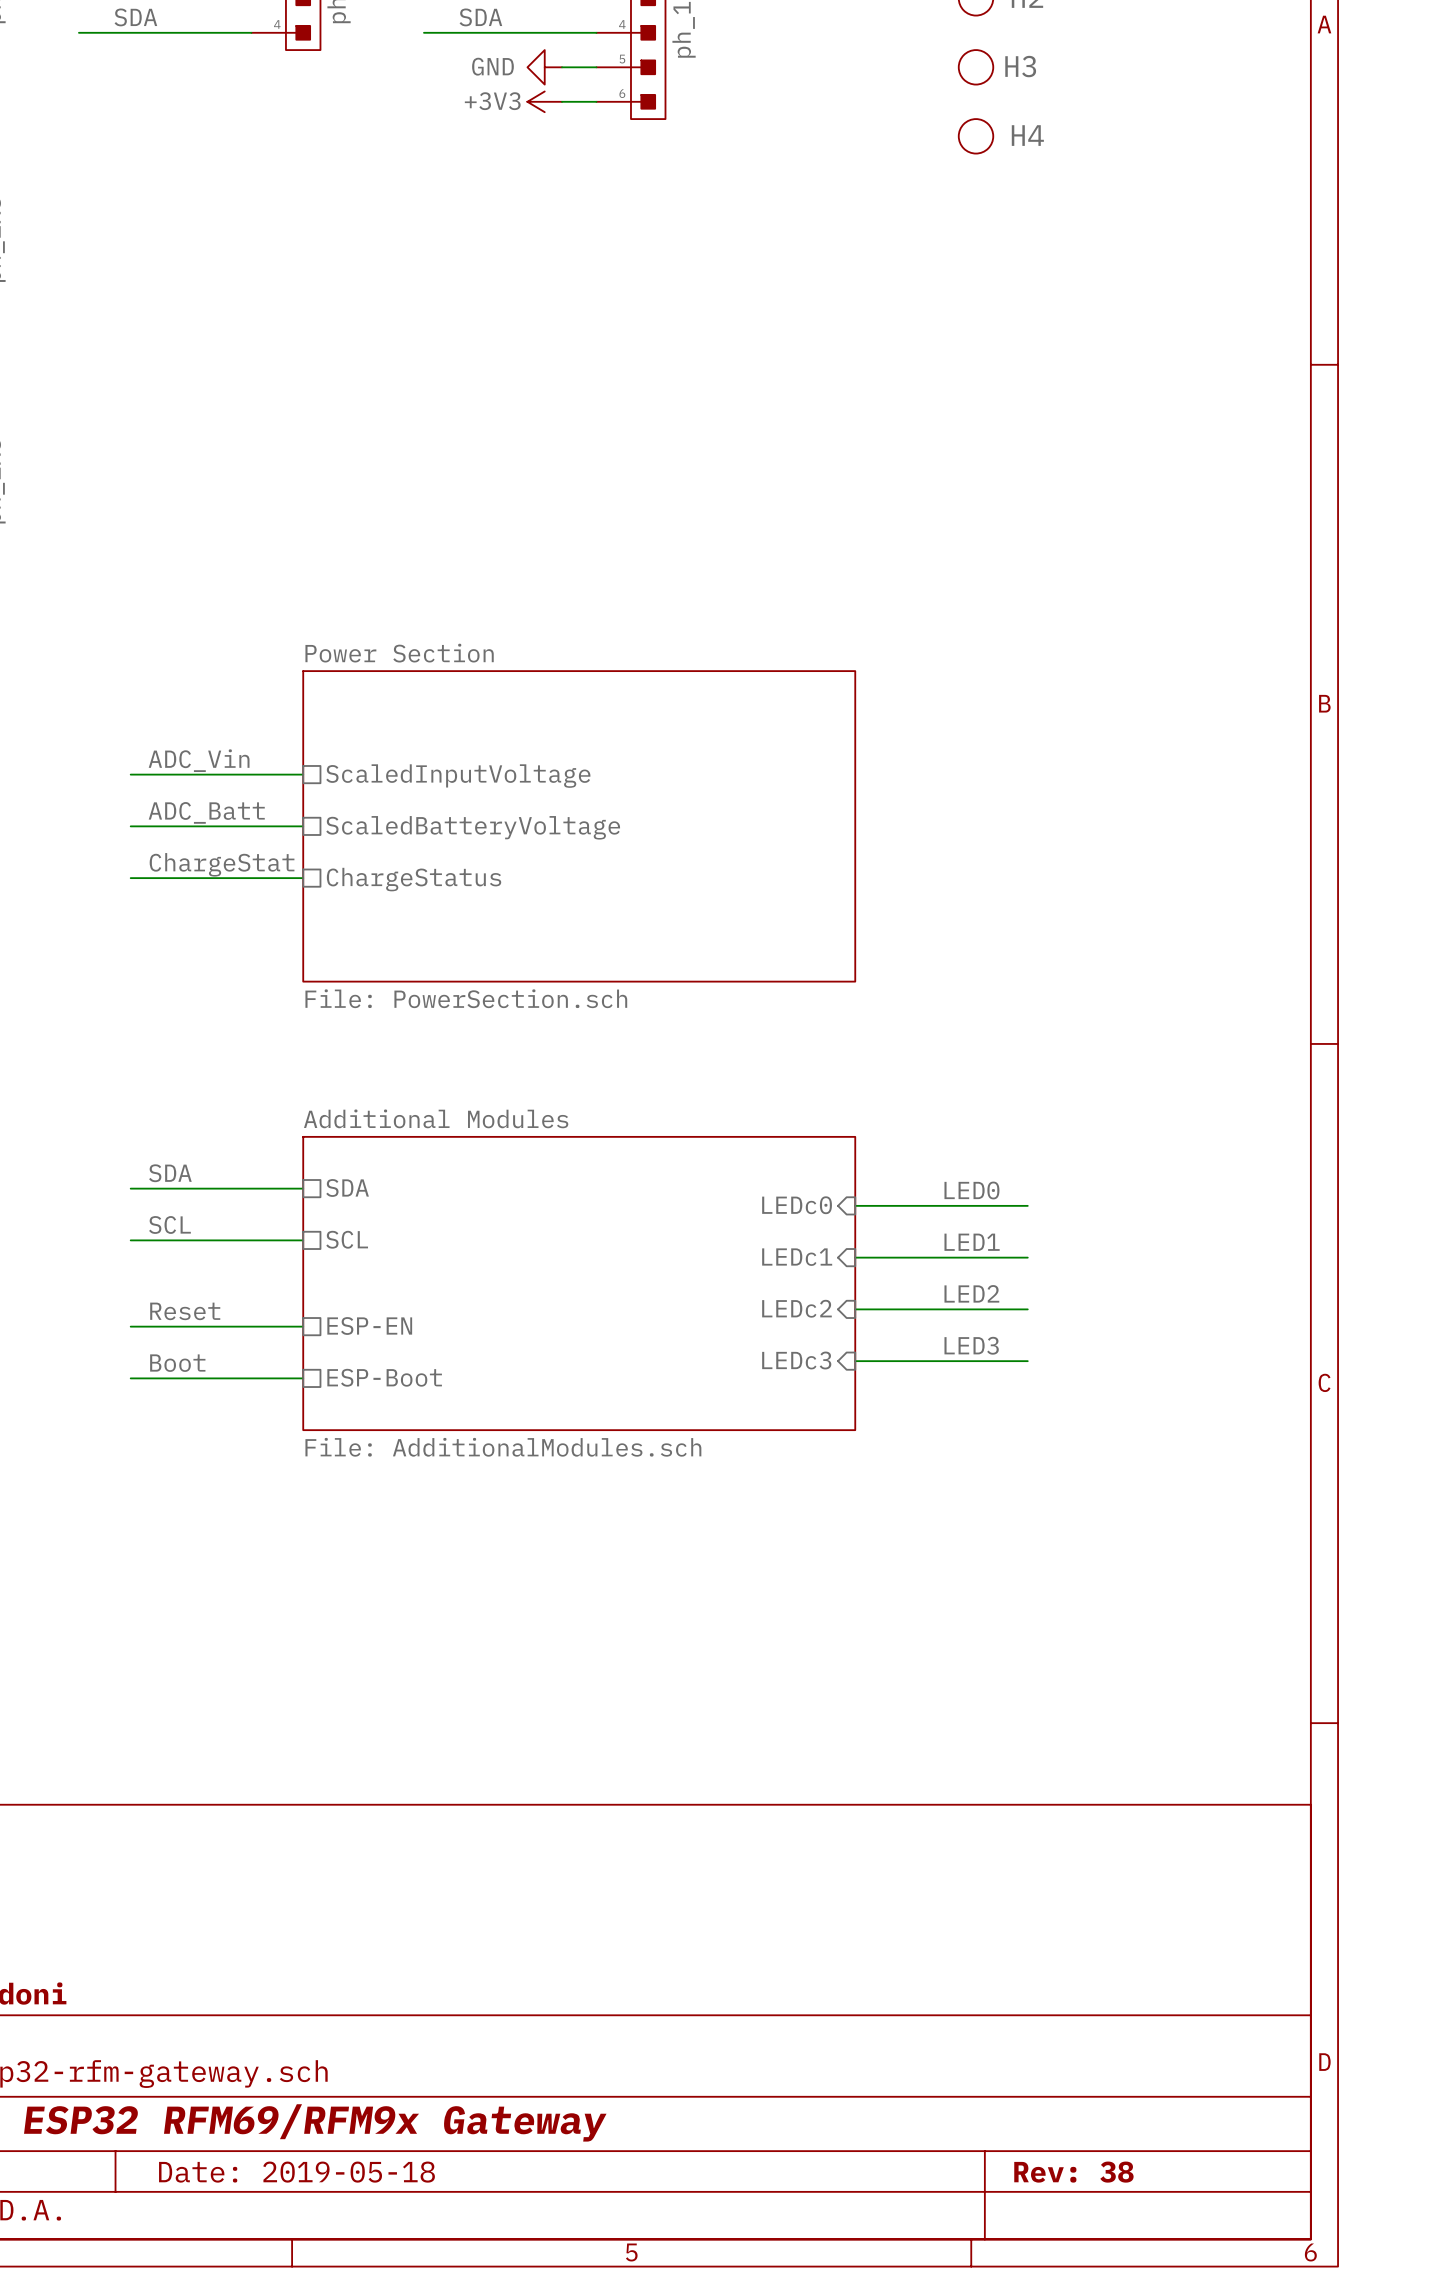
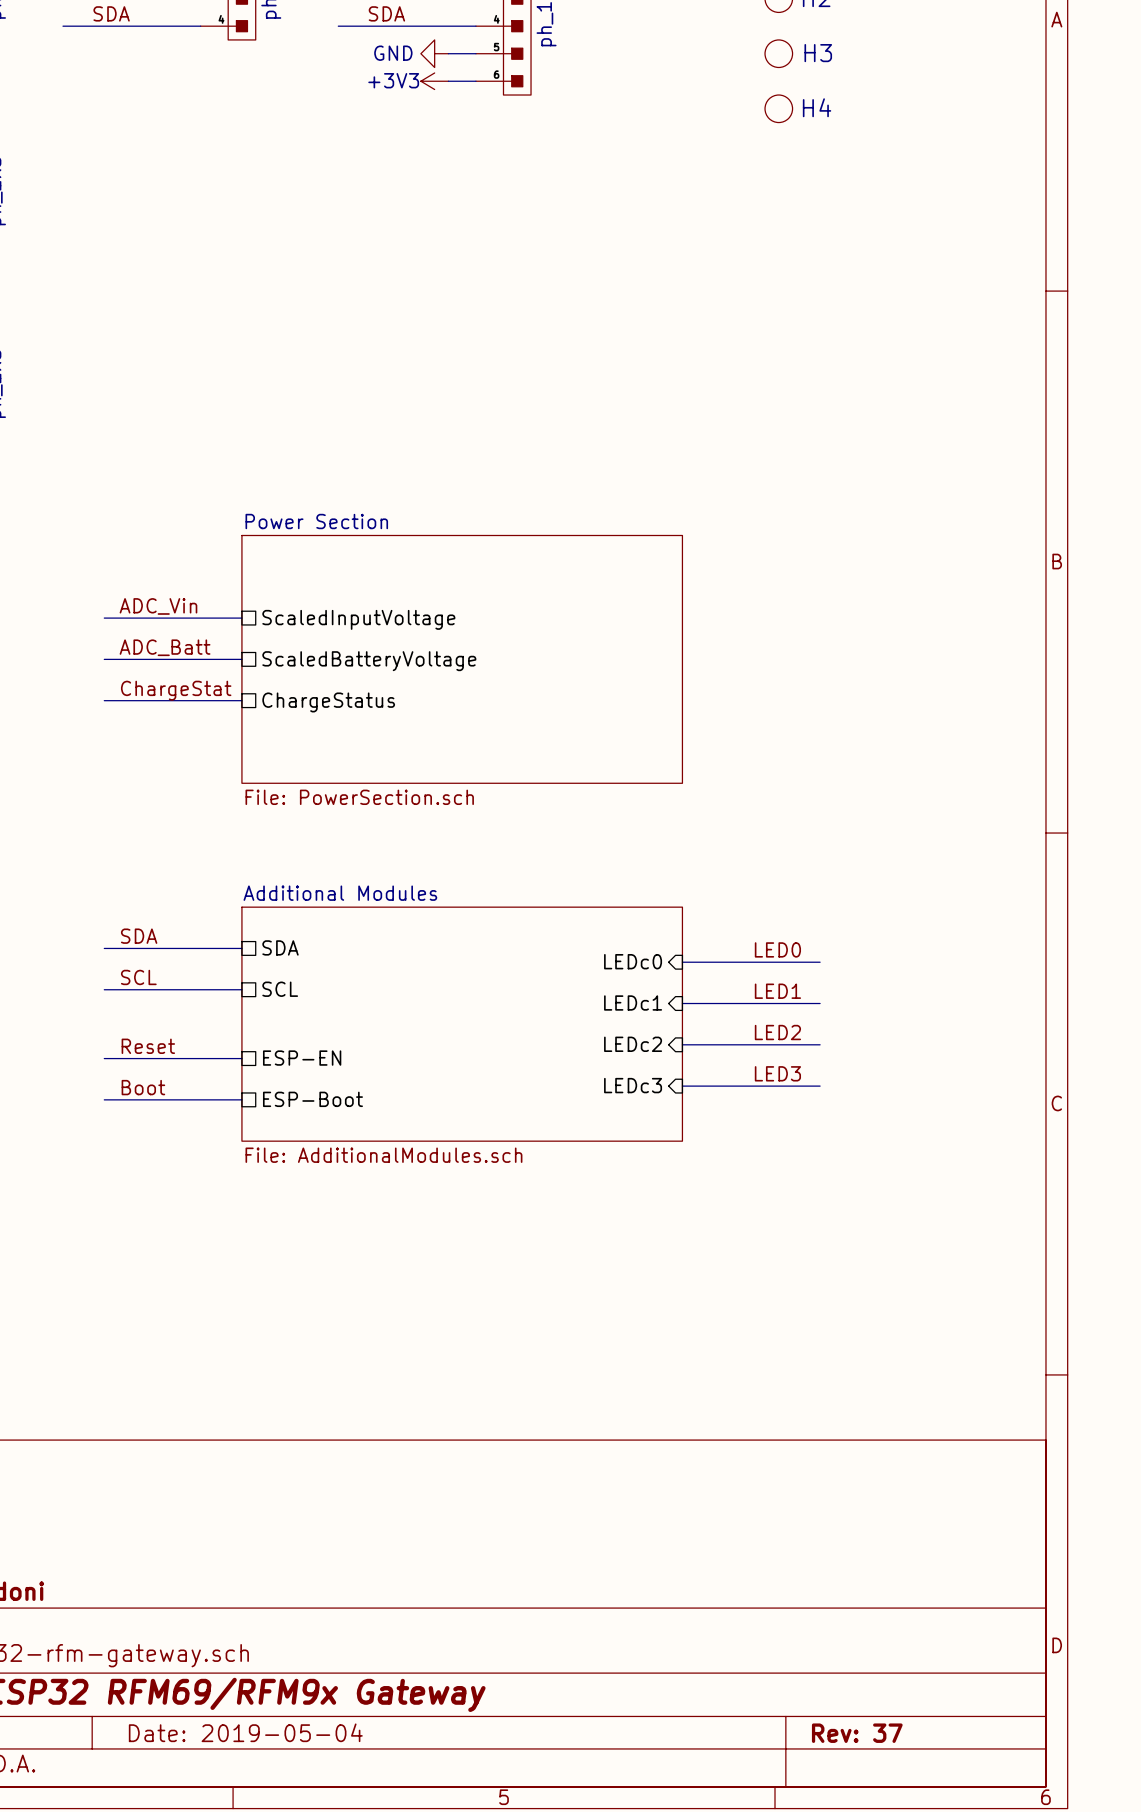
title block: Date: 2019-05-18 (296, 2172) -> Date: 2019-05-04 (245, 1732)
title block: Rev: 38 (1073, 2172) -> Rev: 37 (857, 1733)

